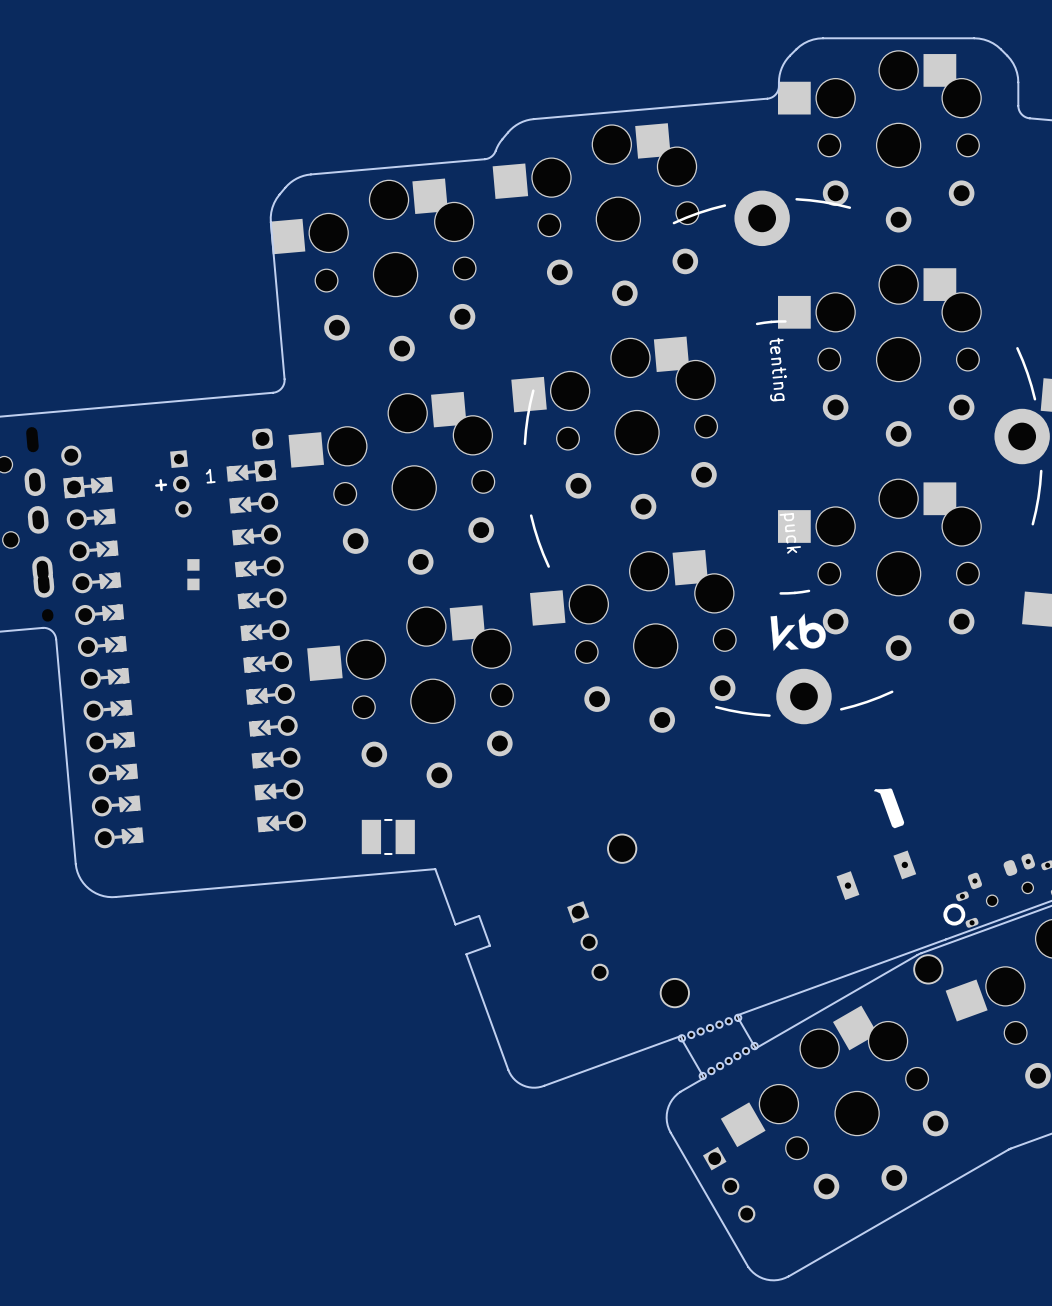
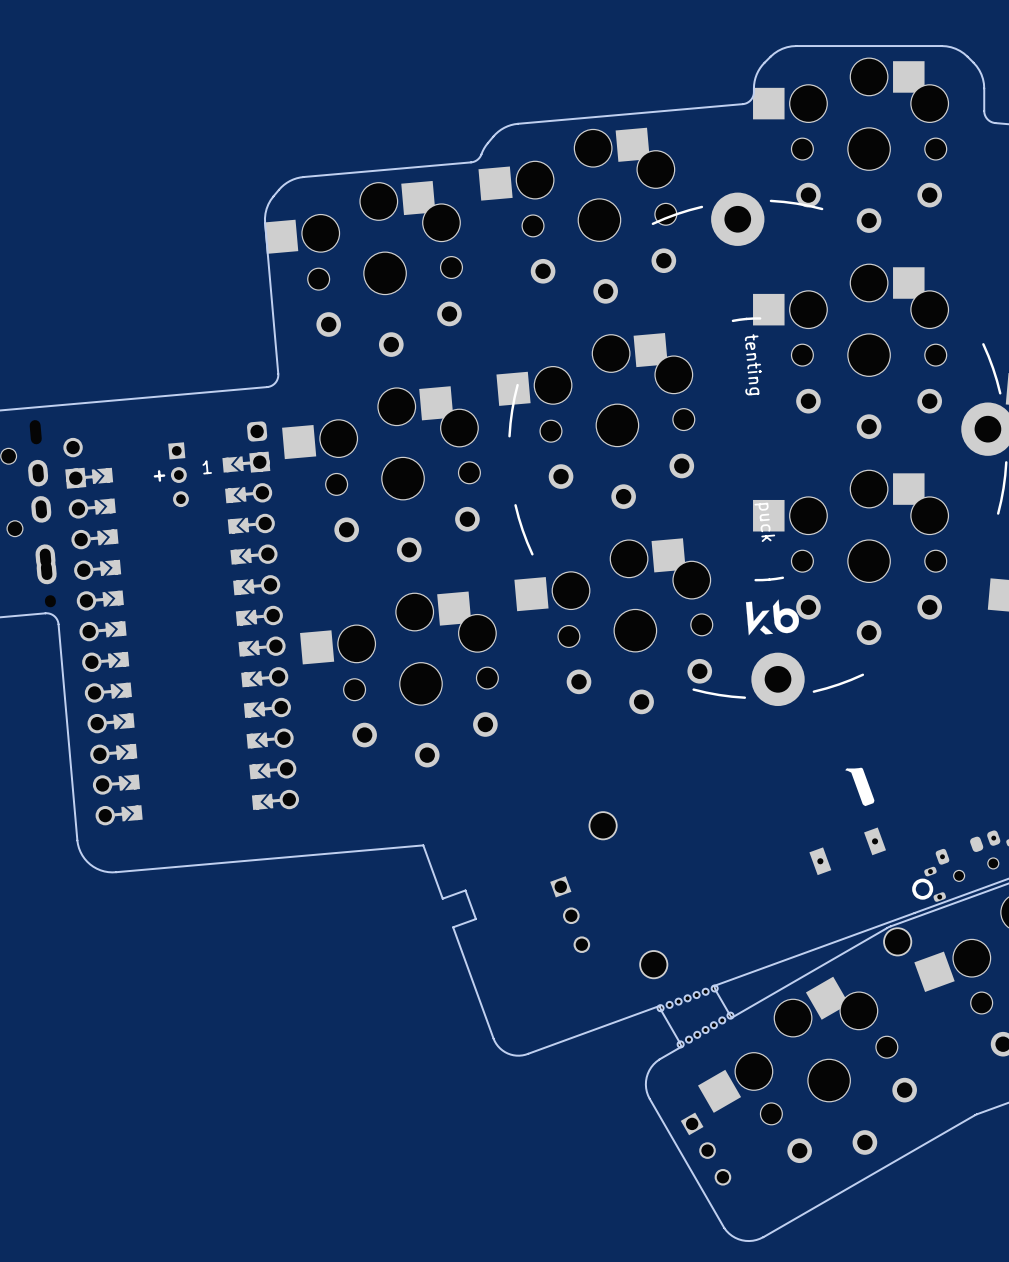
part: (193, 574) -> none
part: (388, 836) -> none

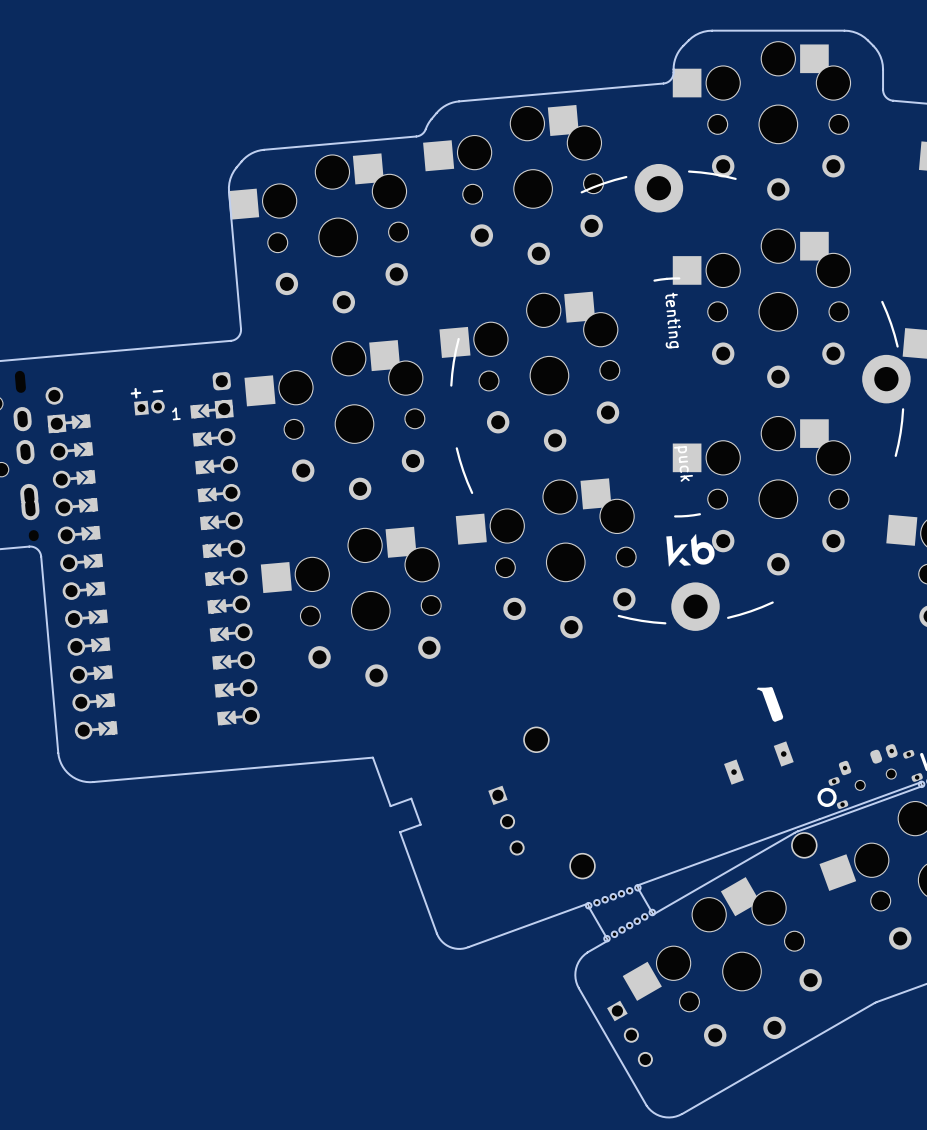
text: none -> - + (146, 393)
part: none -> (149, 407)
part: (178, 474) -> none
text: + (159, 475) -> none

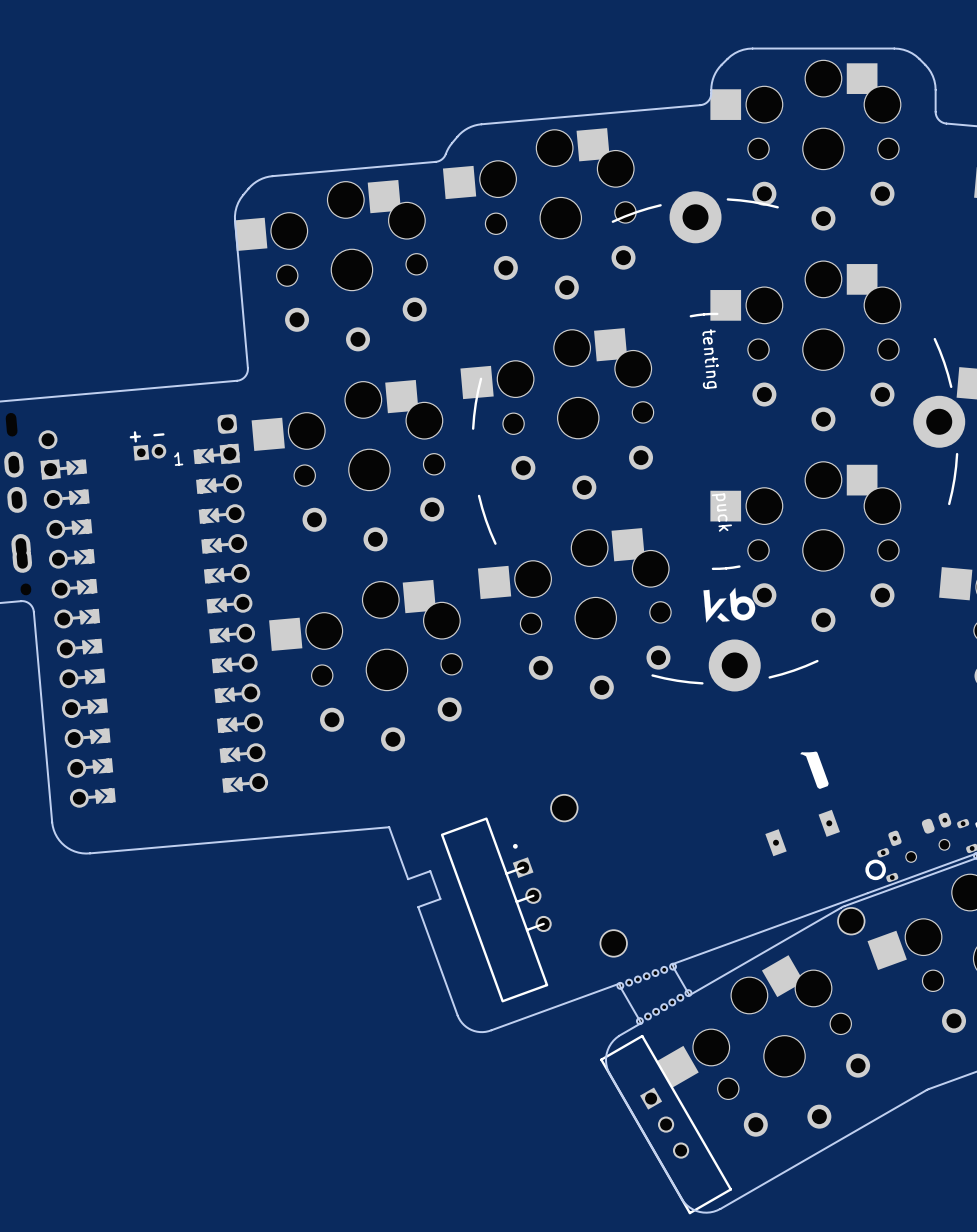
part: (506, 820) -> none
part: none -> (496, 909)
part footprint: [607, 1000, 653, 1068] -> [600, 1034, 732, 1215]

